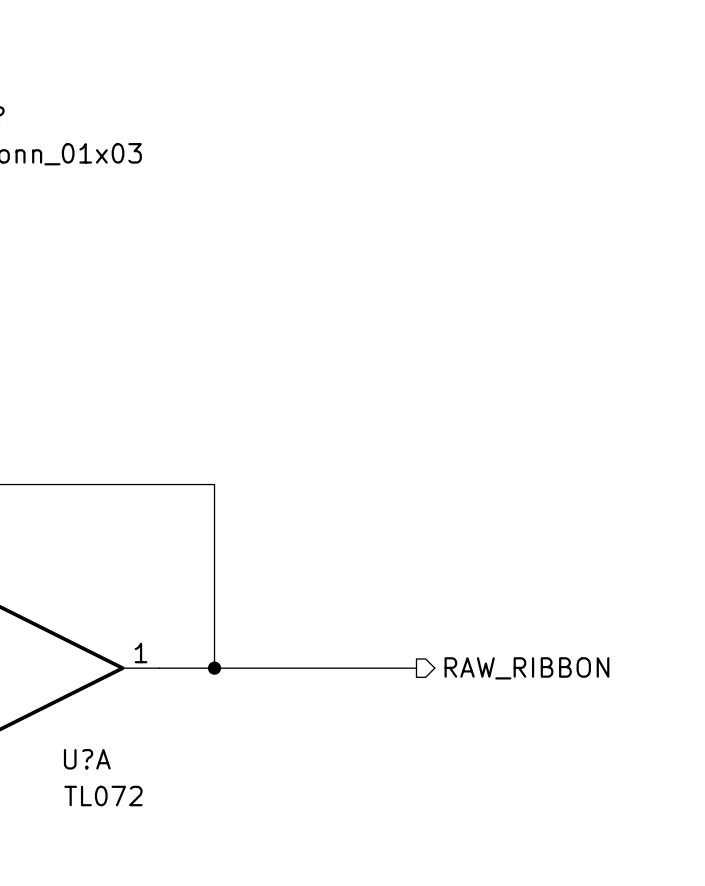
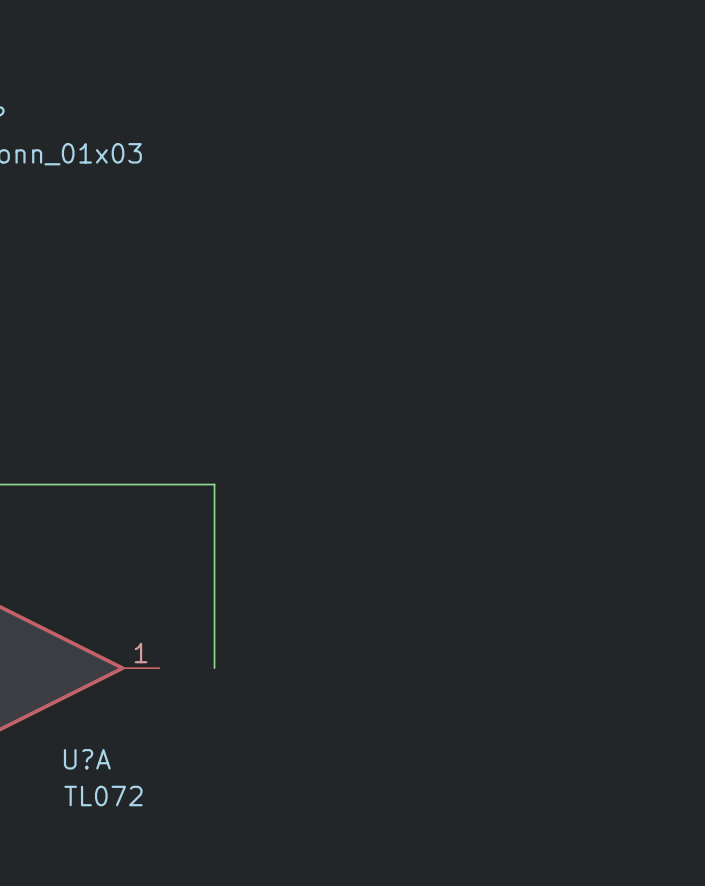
wire: (159, 668) (416, 668) -> none
junction: (214, 668) -> none
hierarchical label: RAW_RIBBON (526, 668) -> none

